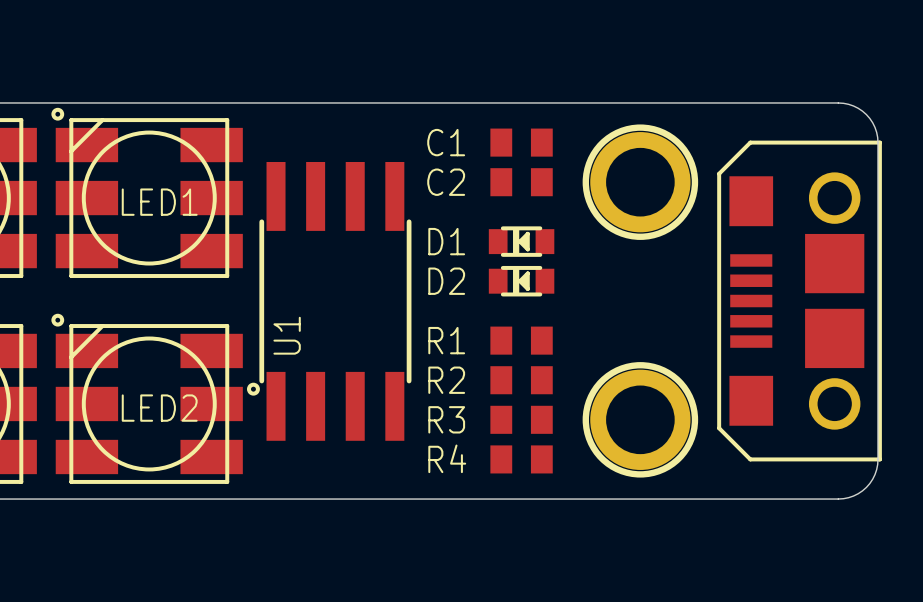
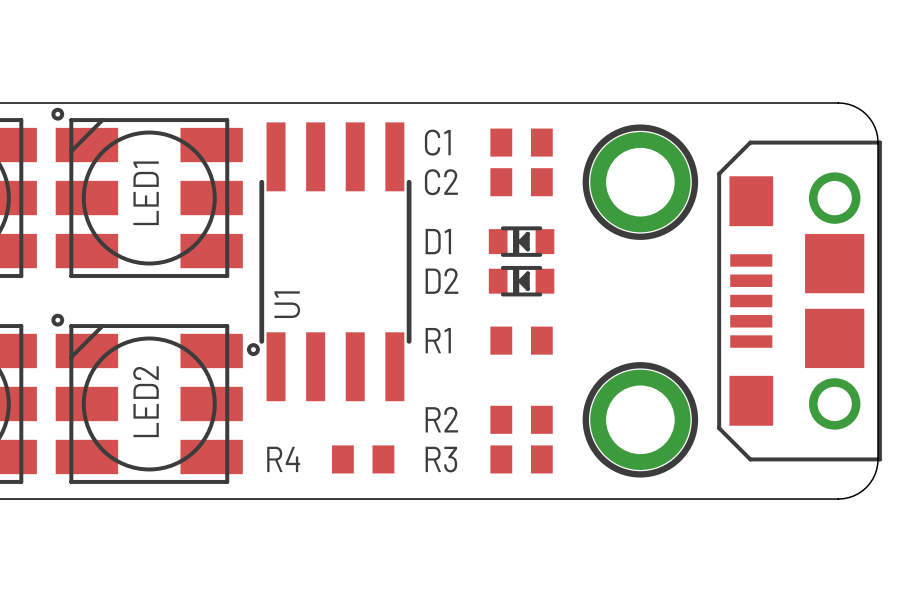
LED1 name rotation: 0° (159, 202) -> 90° counterclockwise (146, 193)
U1 position: (329, 301) -> (329, 261)
R2: (521, 380) -> none
LED2 name rotation: 0° (159, 408) -> 90° counterclockwise (145, 401)
R3 name: R3 (446, 419) -> R2 (441, 419)
R4 name: R4 (447, 458) -> R3 (441, 459)
R4: none -> (363, 459)

